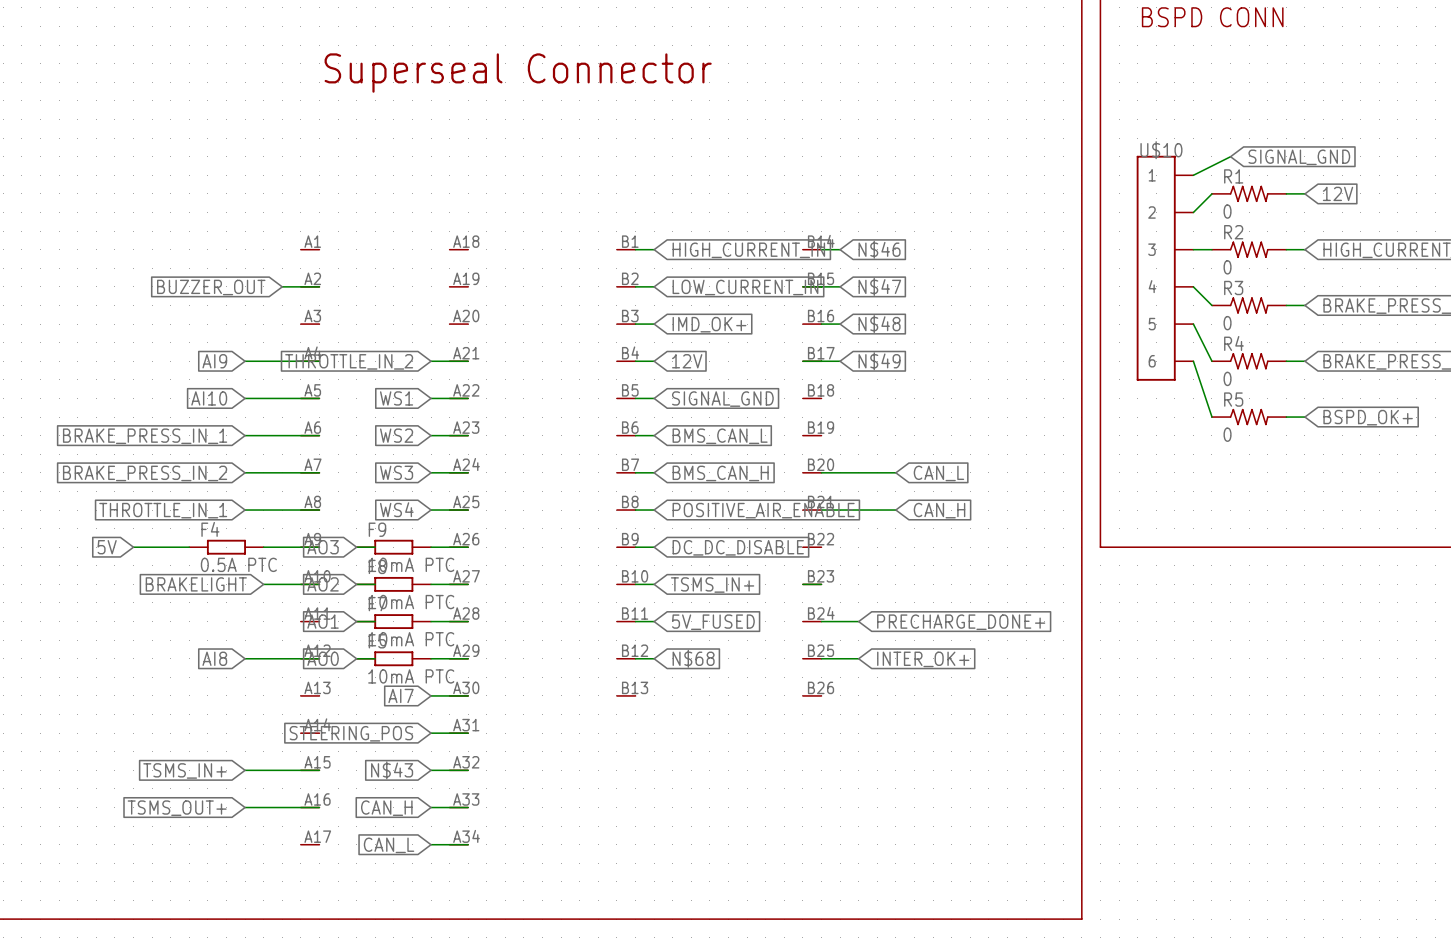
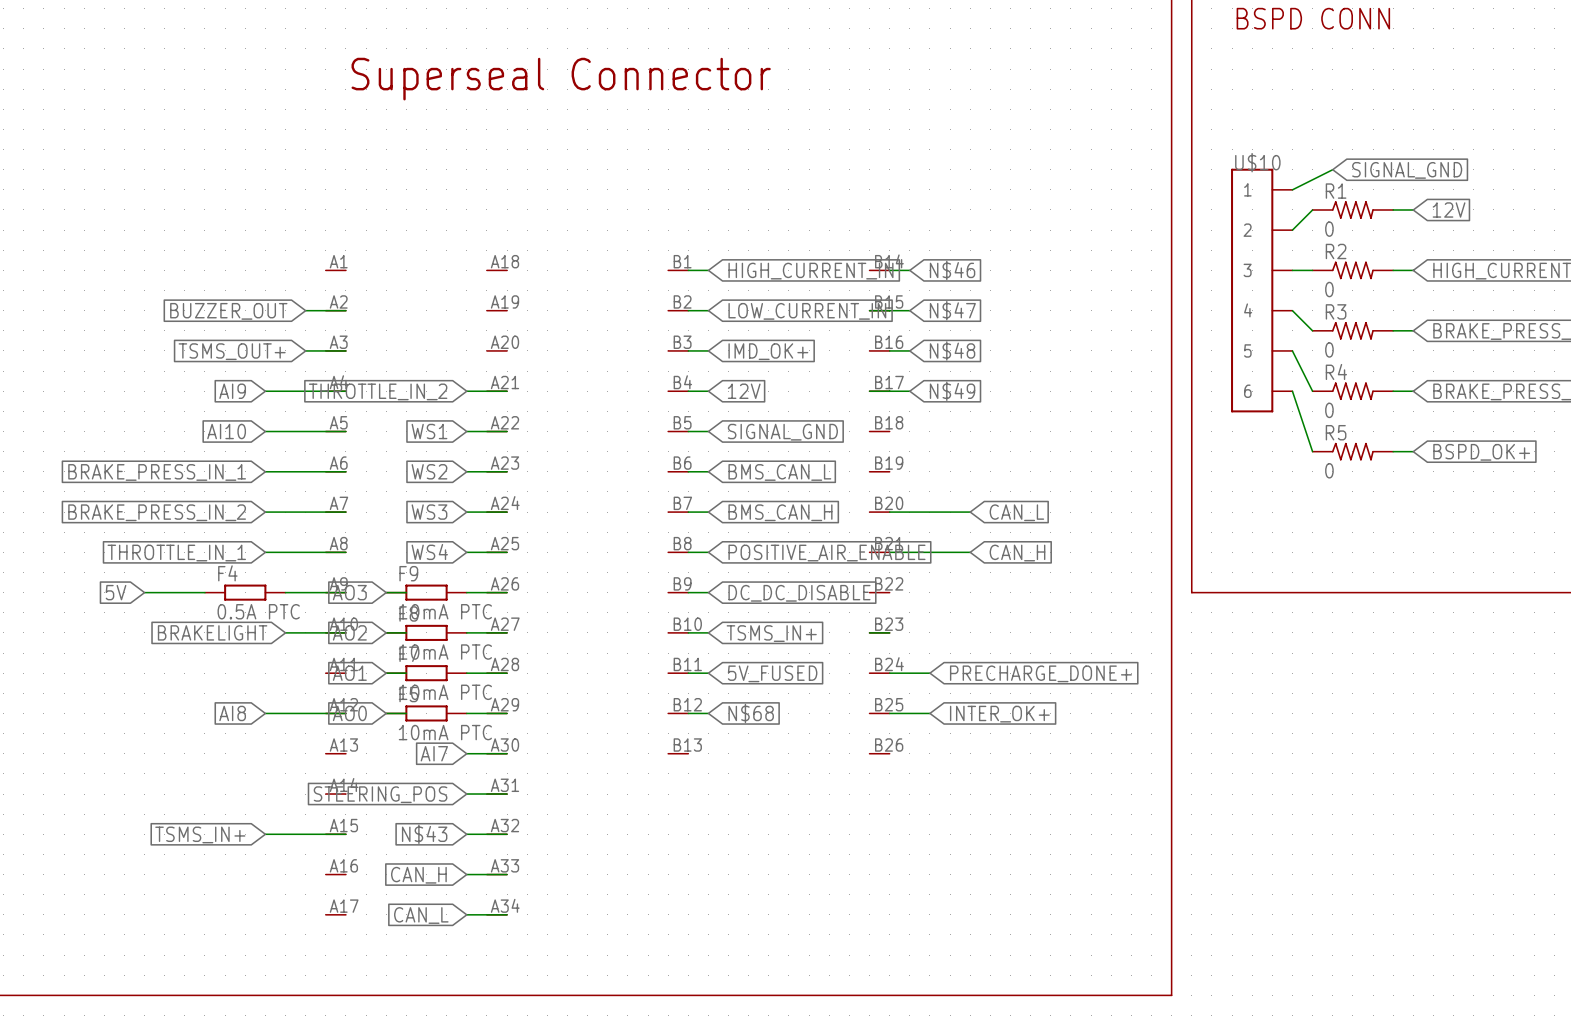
global label: none -> TSMS_OUT+ (232, 351)
wire: none -> (305, 350) (345, 350)
wire: (245, 807) (319, 807) -> none
global label: TSMS_OUT+ (177, 808) -> none

